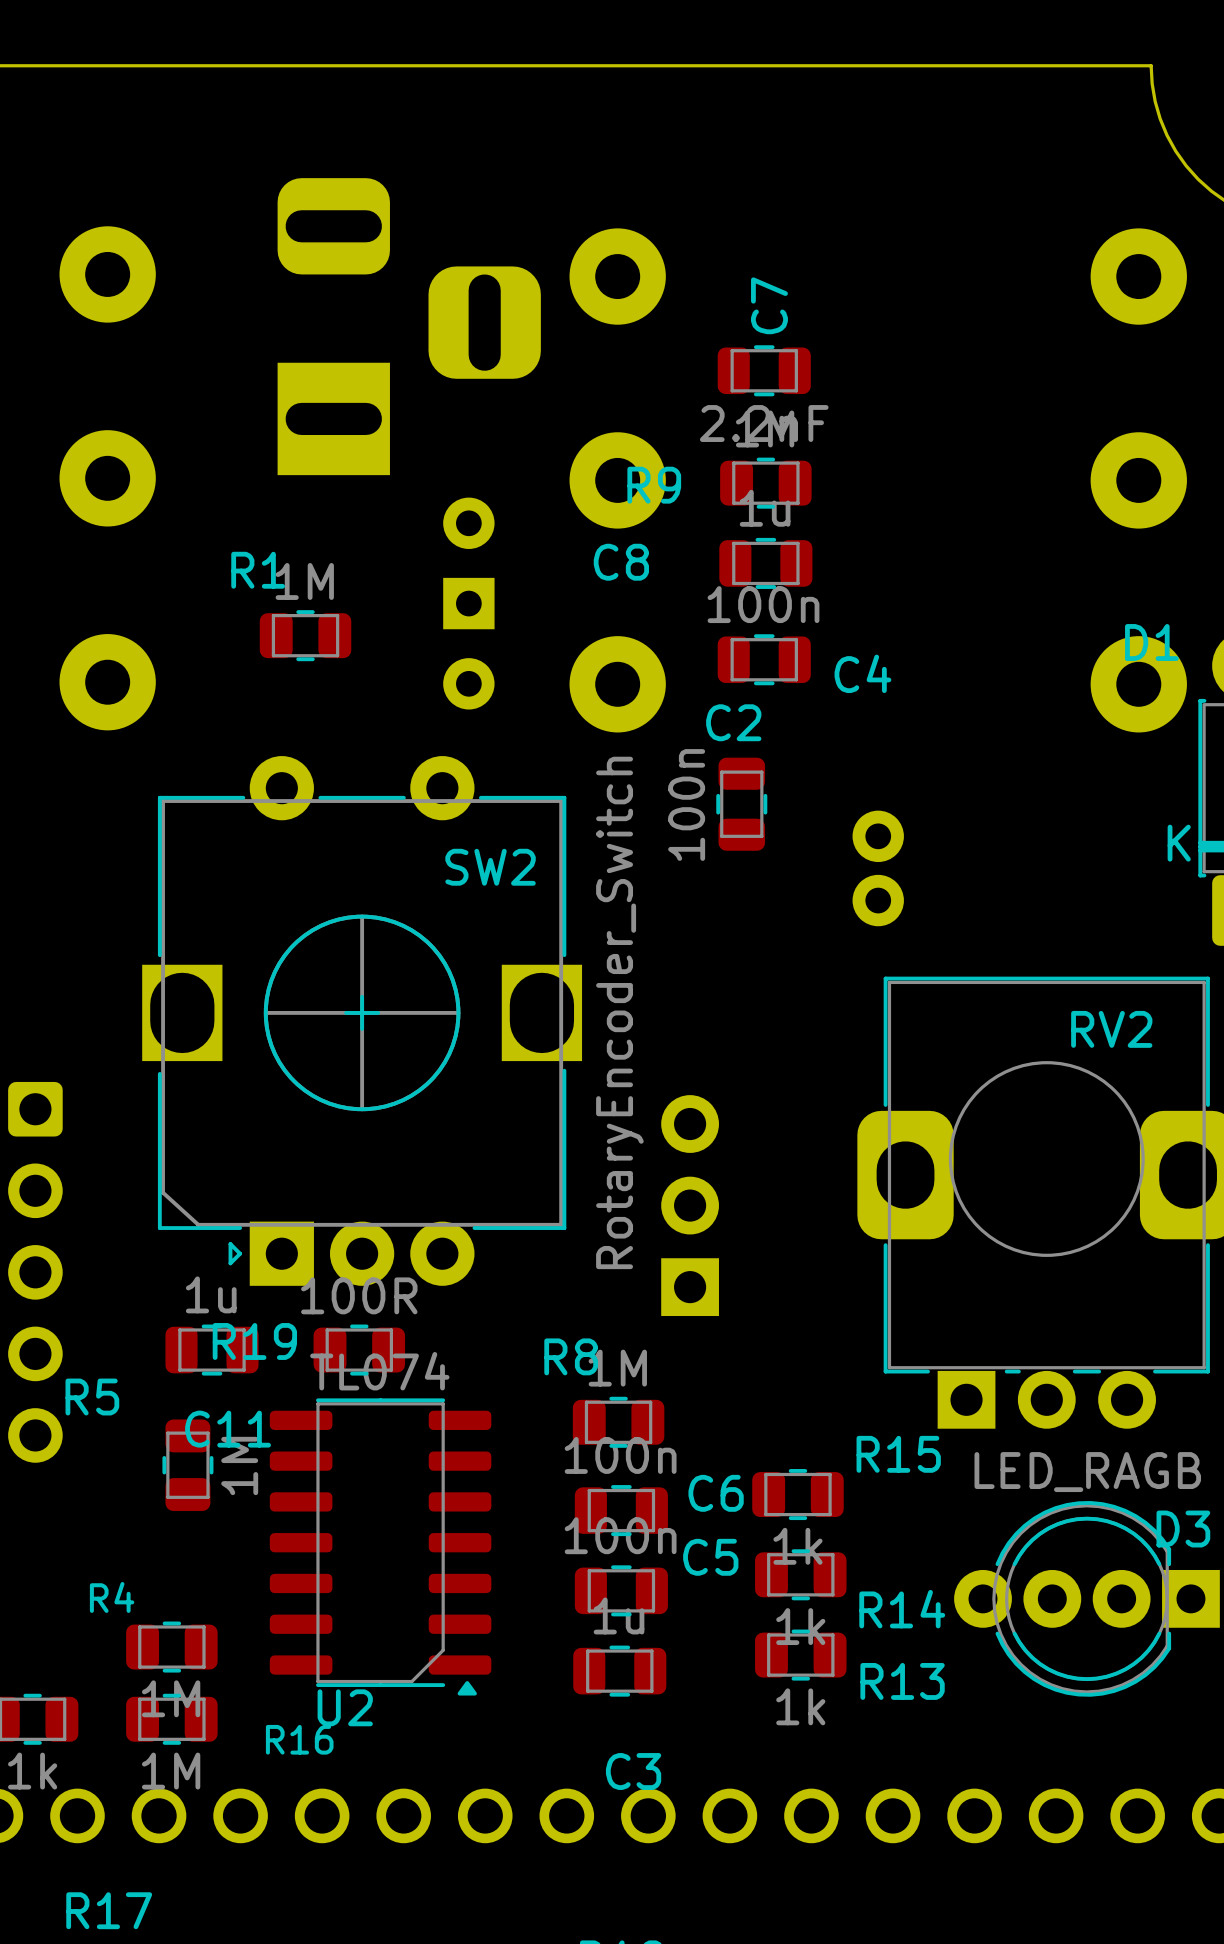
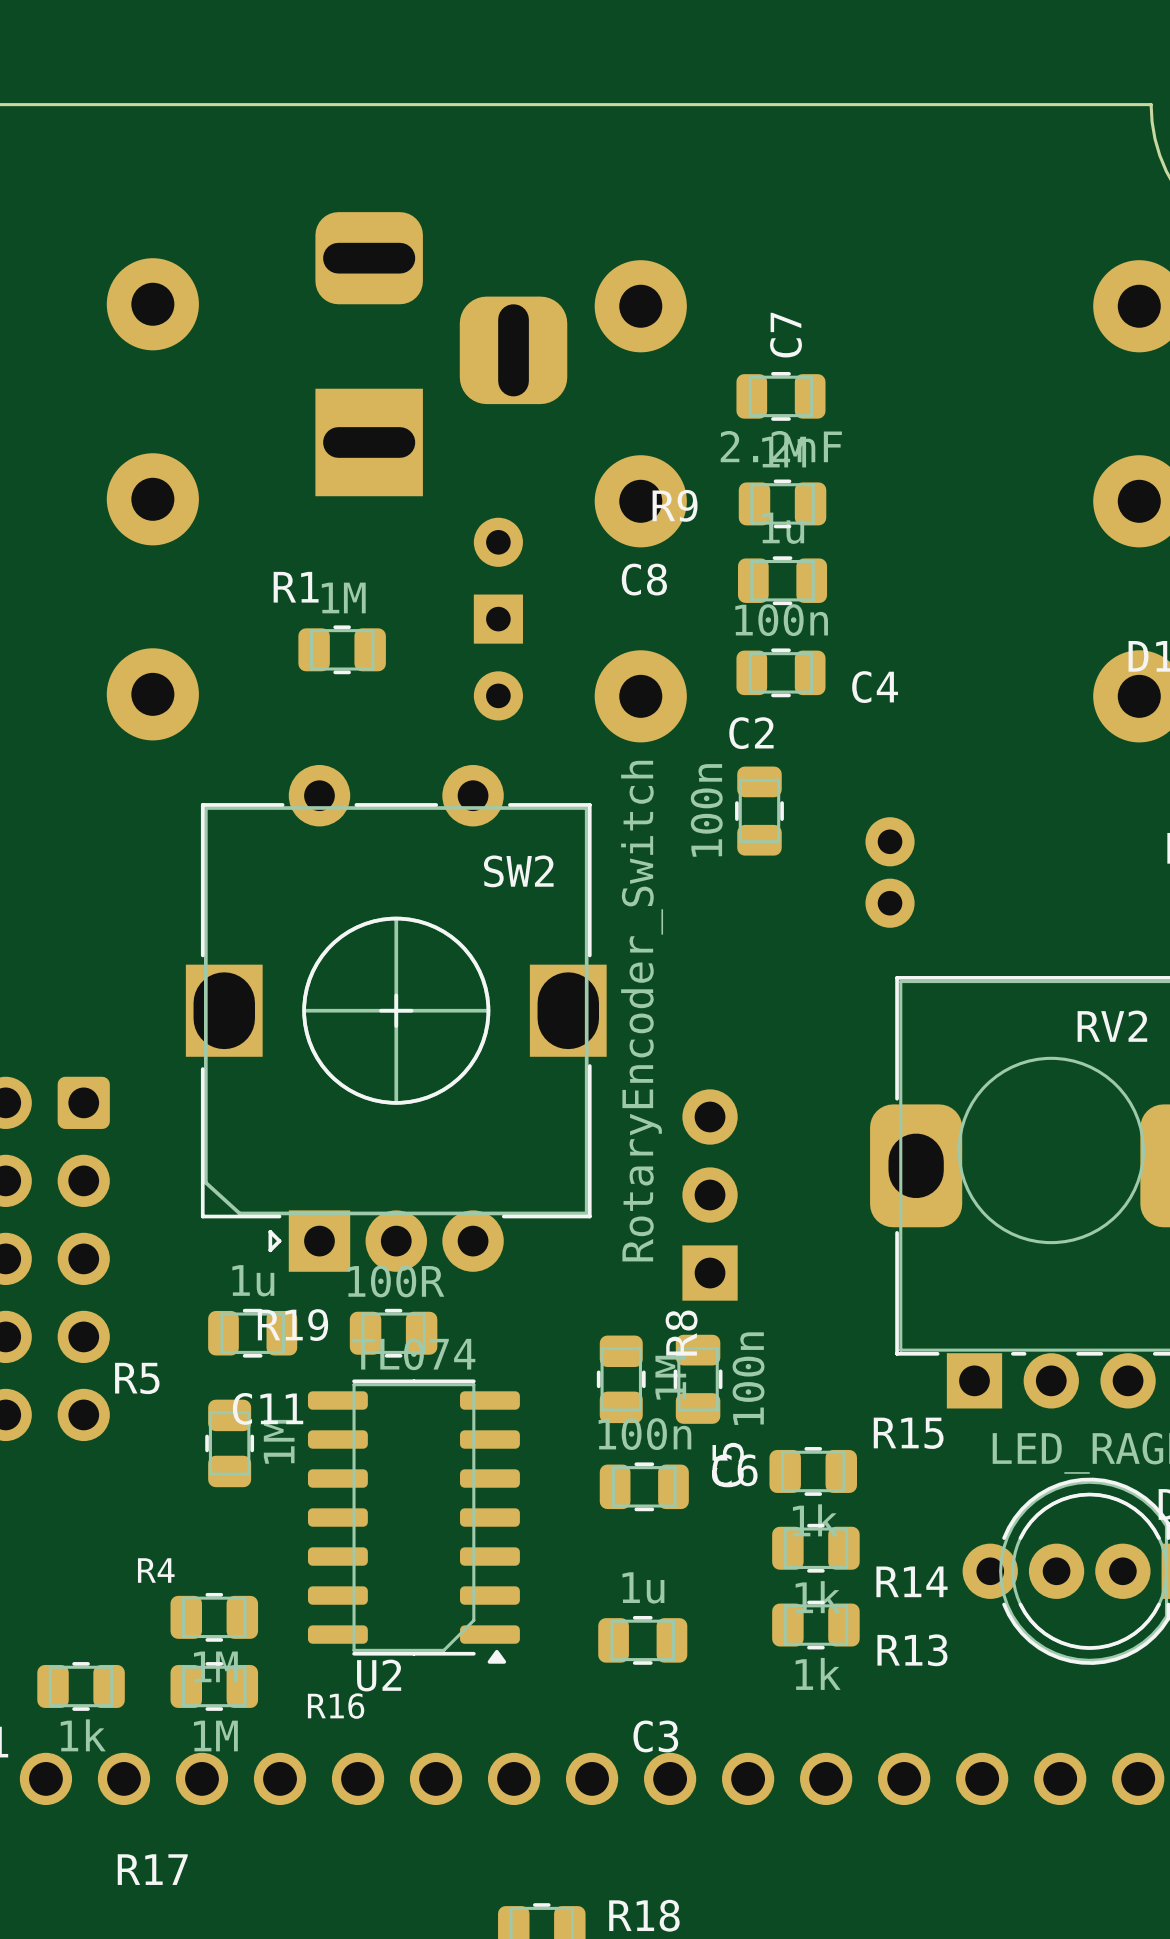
R8 rotation: 0° (618, 1422) -> 90° clockwise (621, 1379)
C5 rotation: 0° (621, 1590) -> 90° clockwise (698, 1379)
C5 position: (621, 1590) -> (698, 1379)

